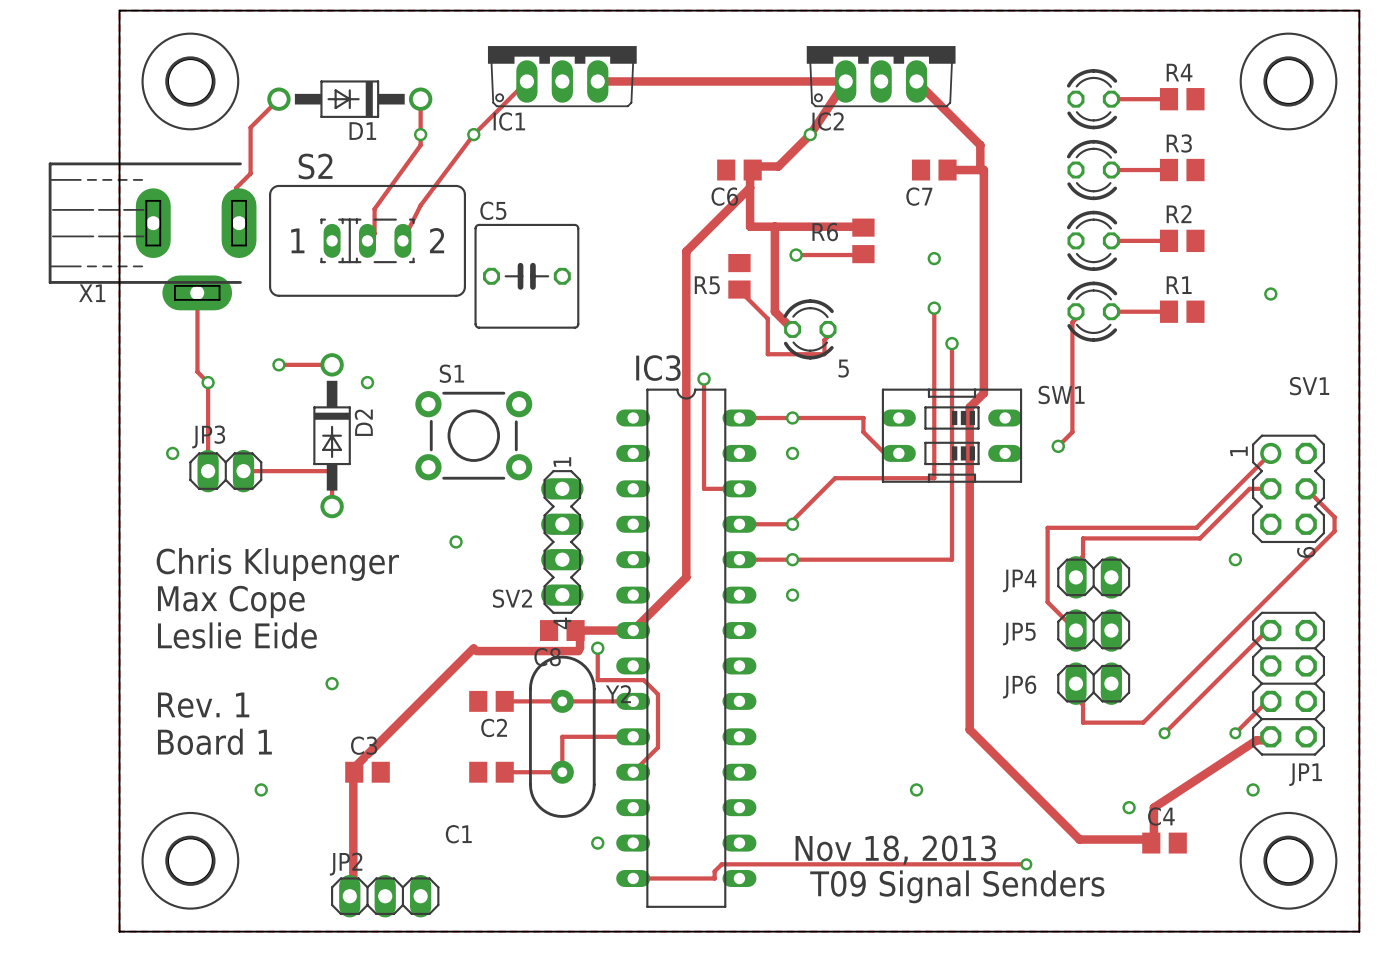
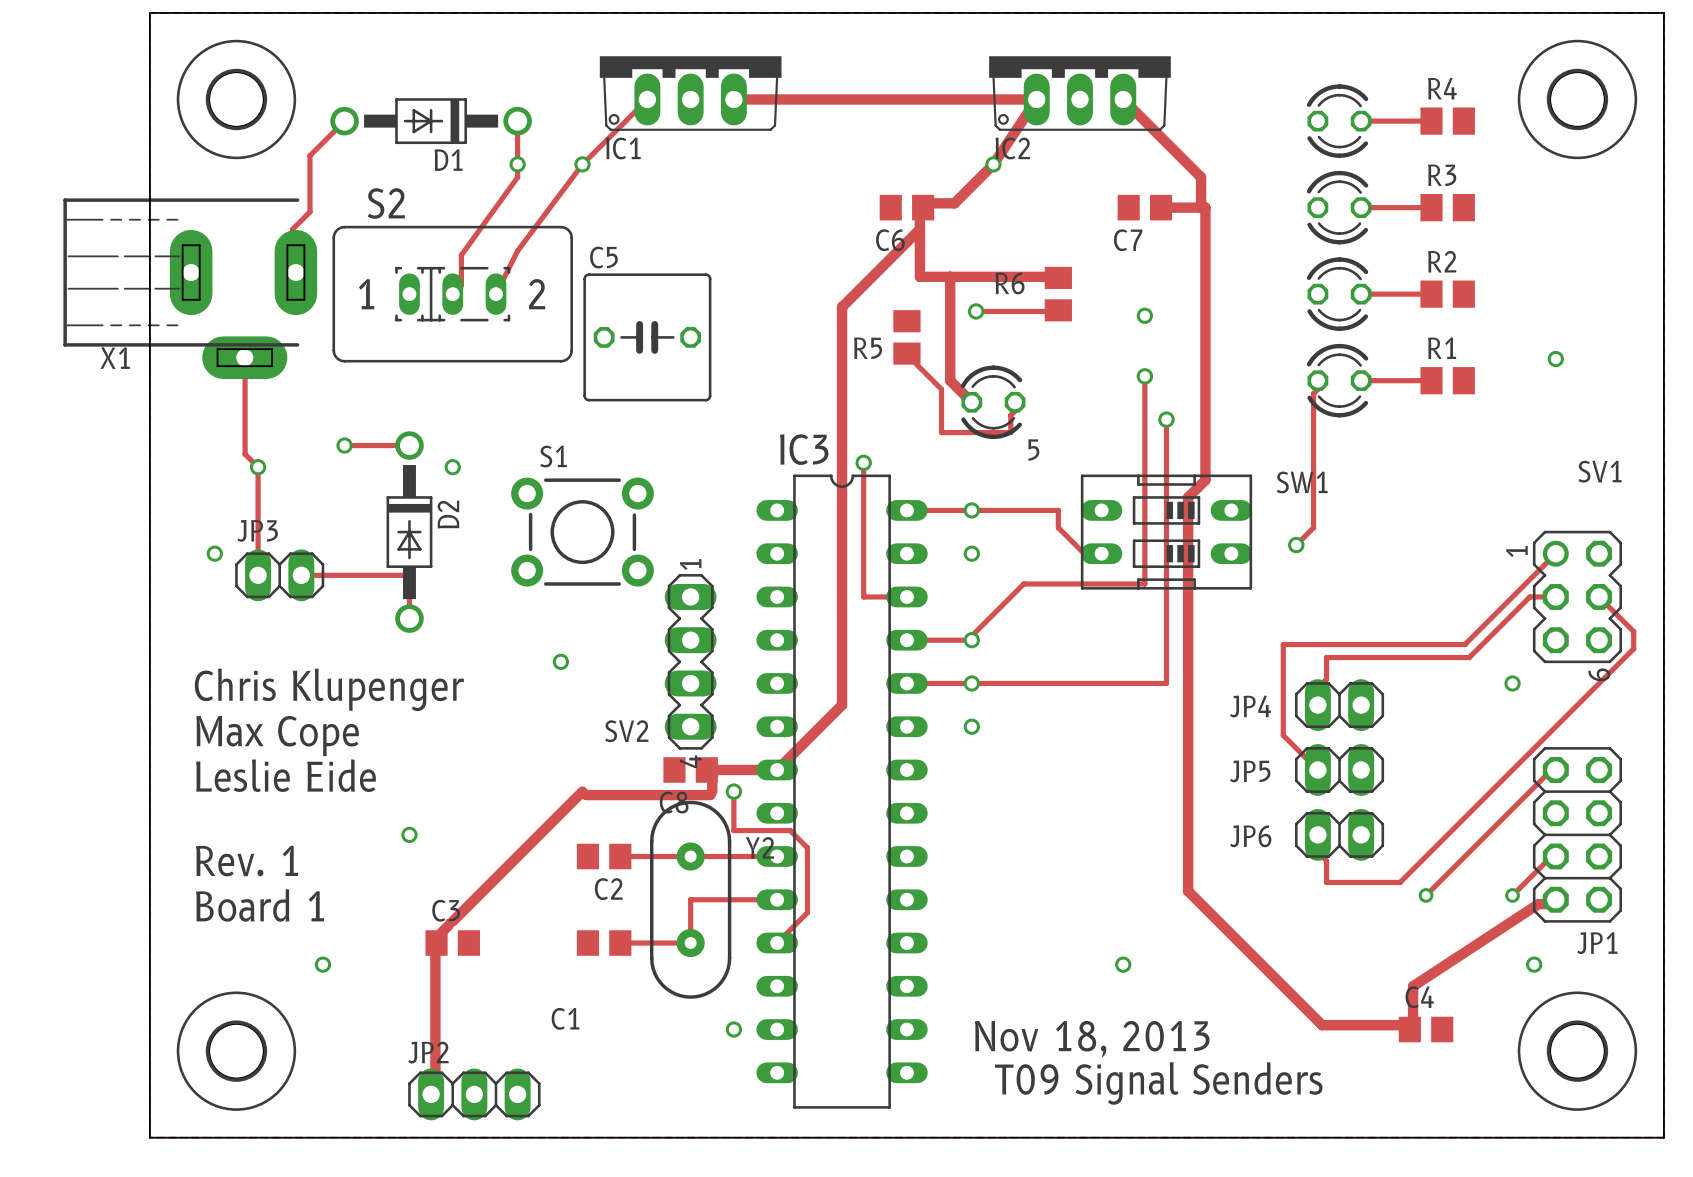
via: (1129, 807) -> none
track: (1026, 864) (721, 864) (714, 871) (714, 878) (633, 878) -> none
via: (1026, 864) -> none

